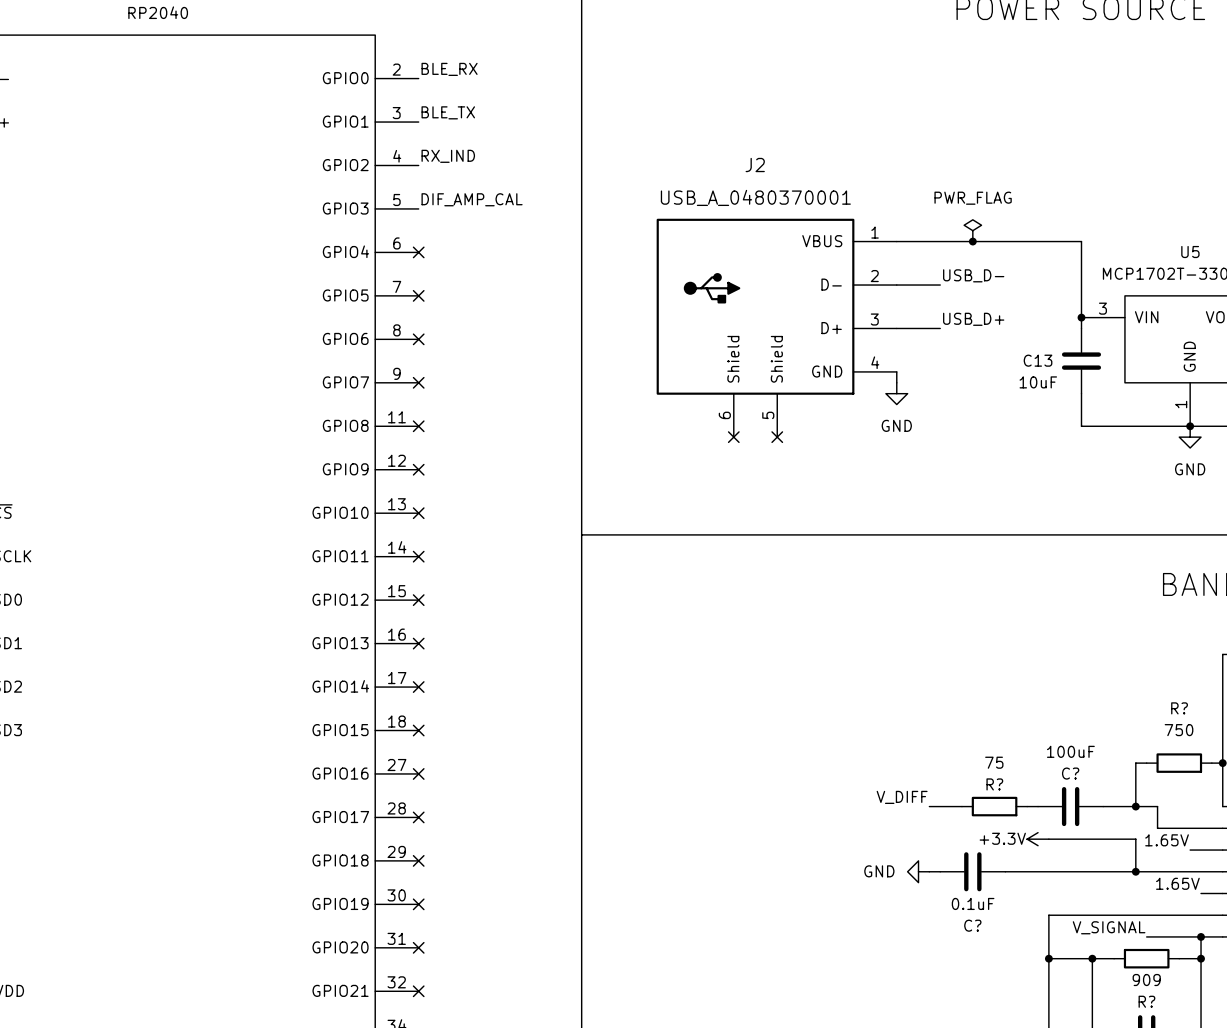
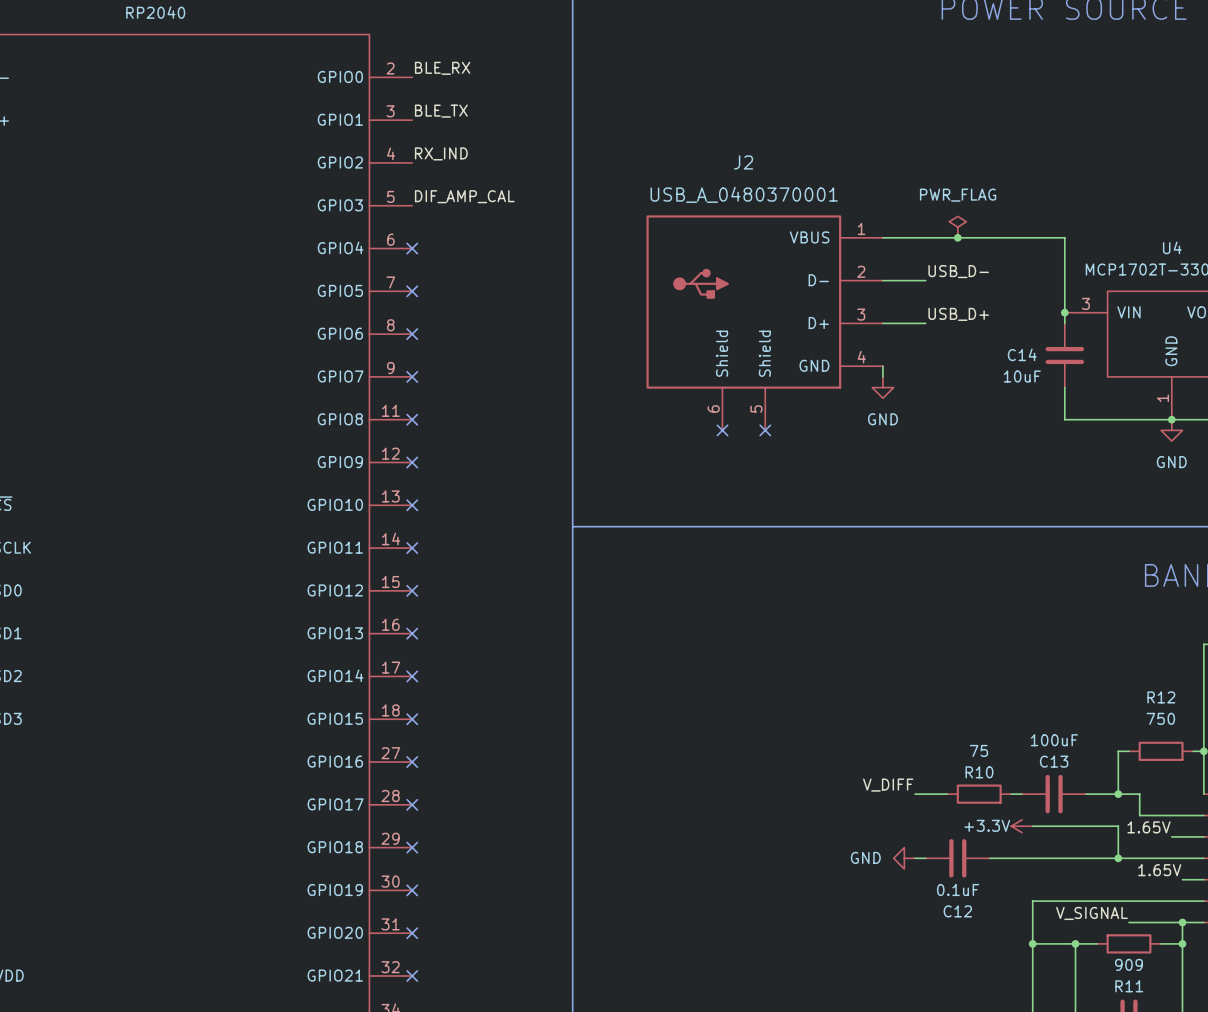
U5 name: U5 (1190, 252) -> U4 (1172, 247)
C13 name: C13 (1038, 360) -> C14 (1022, 354)
R? name: R? (1179, 708) -> R12 (1161, 697)
C? name: C? (1070, 773) -> C13 (1054, 761)
R? name: R? (994, 784) -> R10 (979, 772)
C? name: C? (972, 925) -> C12 (957, 911)
R? name: R? (1146, 1001) -> R11 (1129, 986)

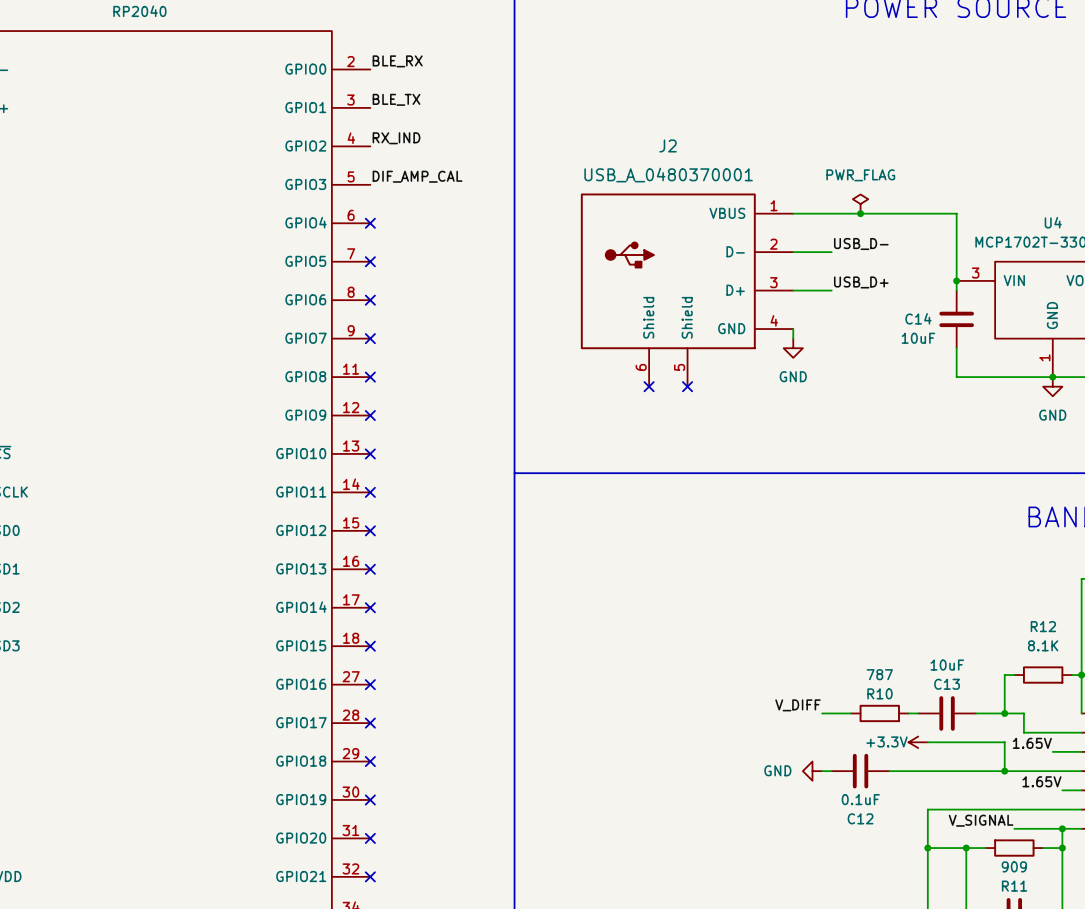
R12 value: 750 (1160, 718) -> 8.1K (1043, 645)
C13 value: 100uF (1054, 740) -> 10uF (947, 665)
R10 value: 75 (978, 750) -> 787 (879, 674)

